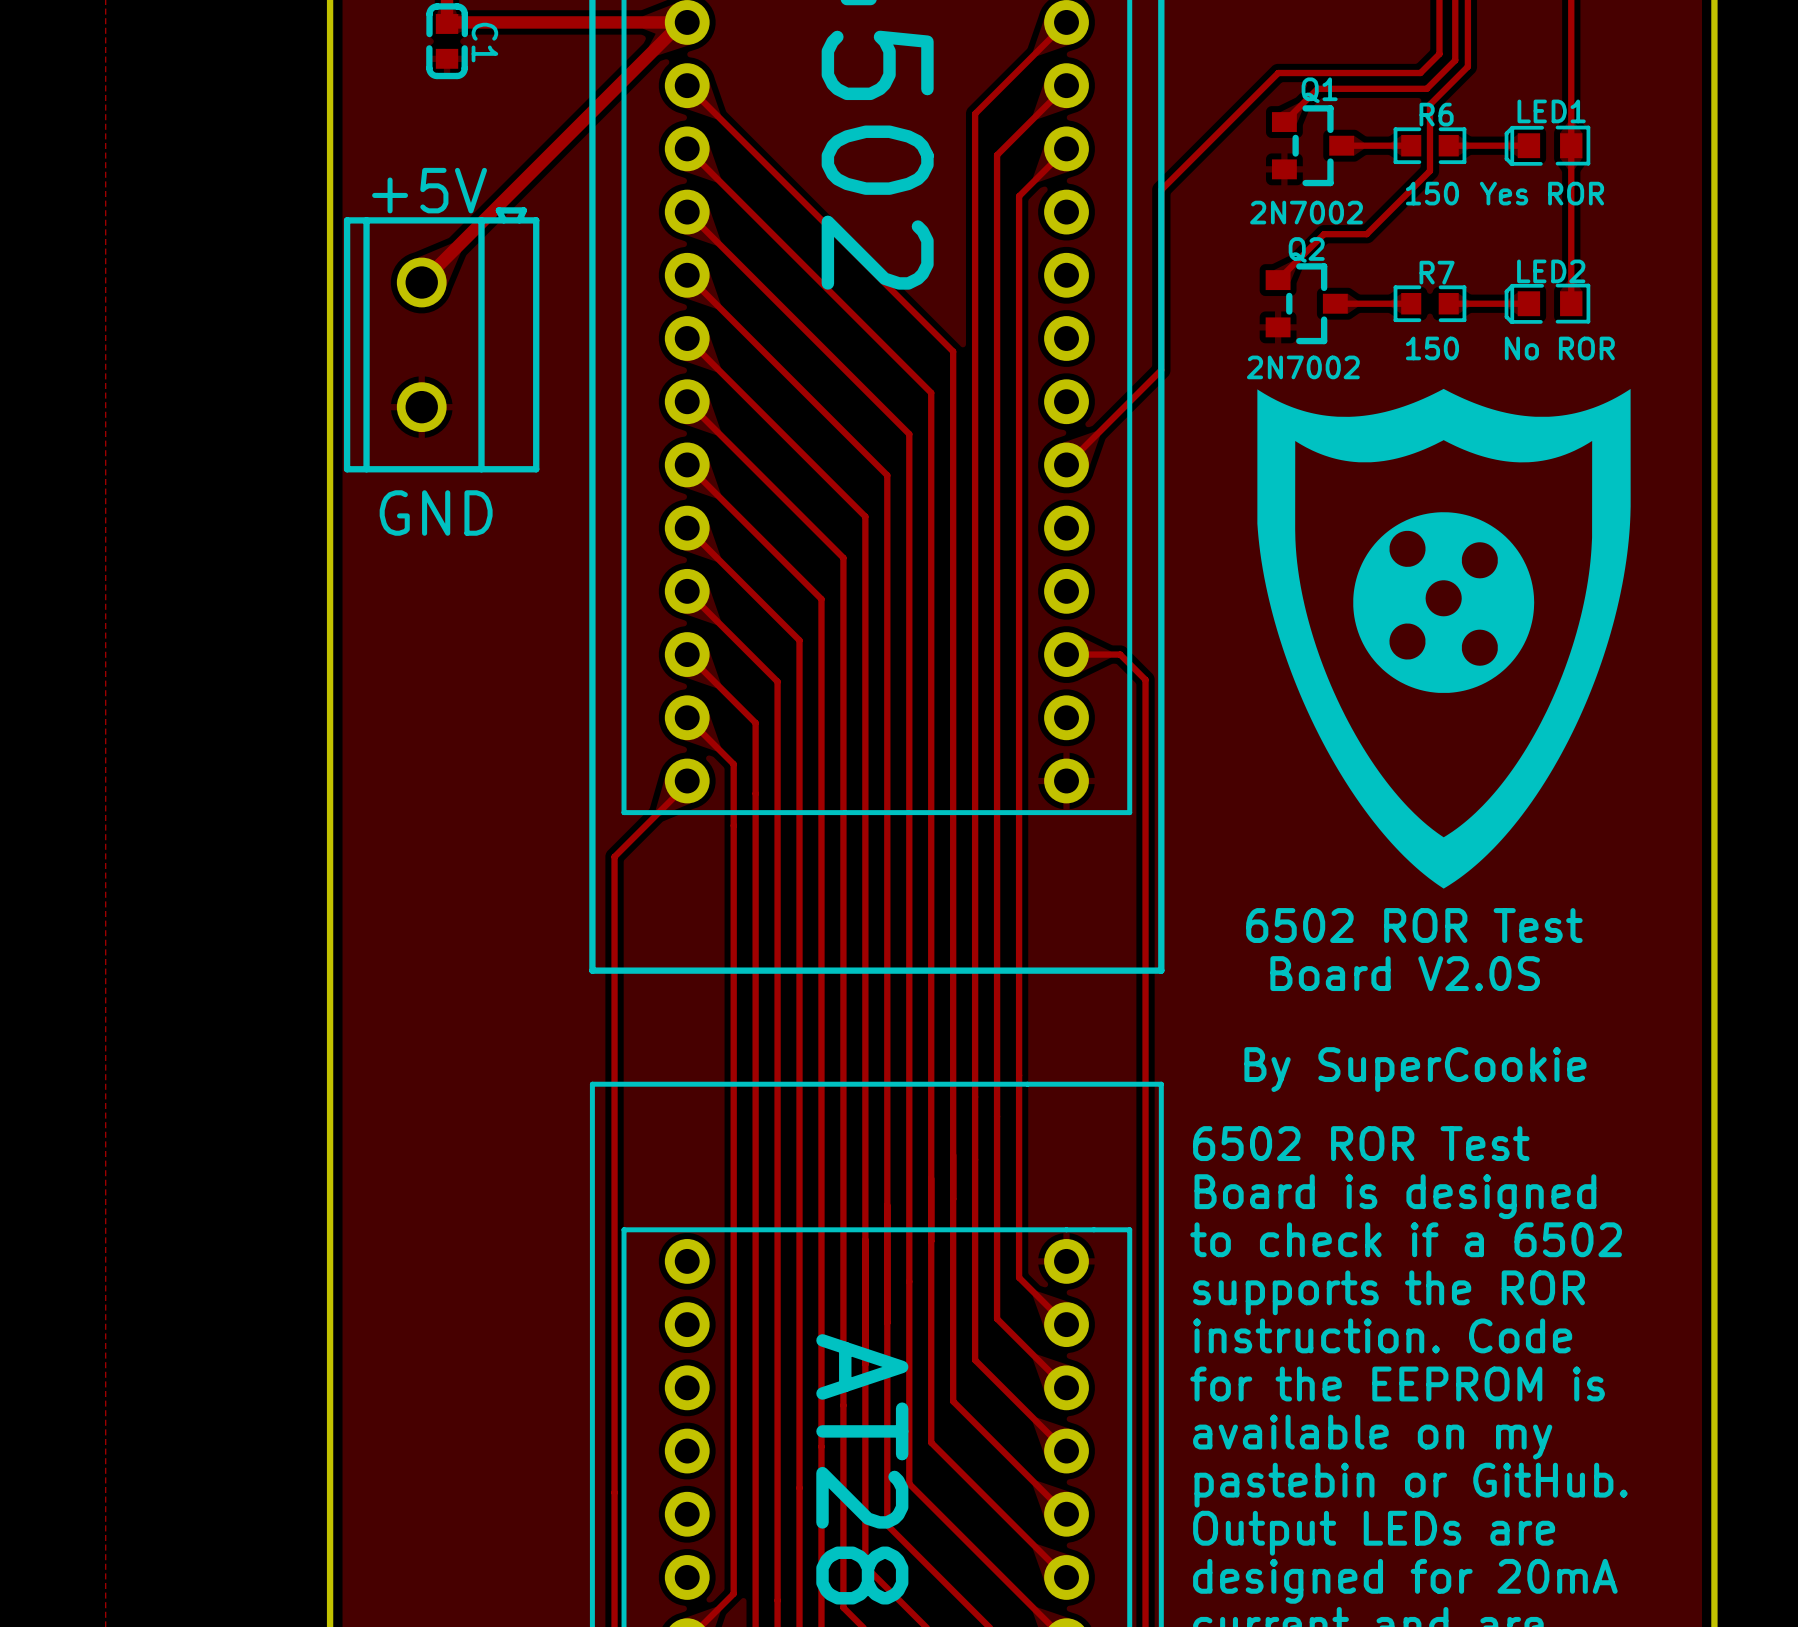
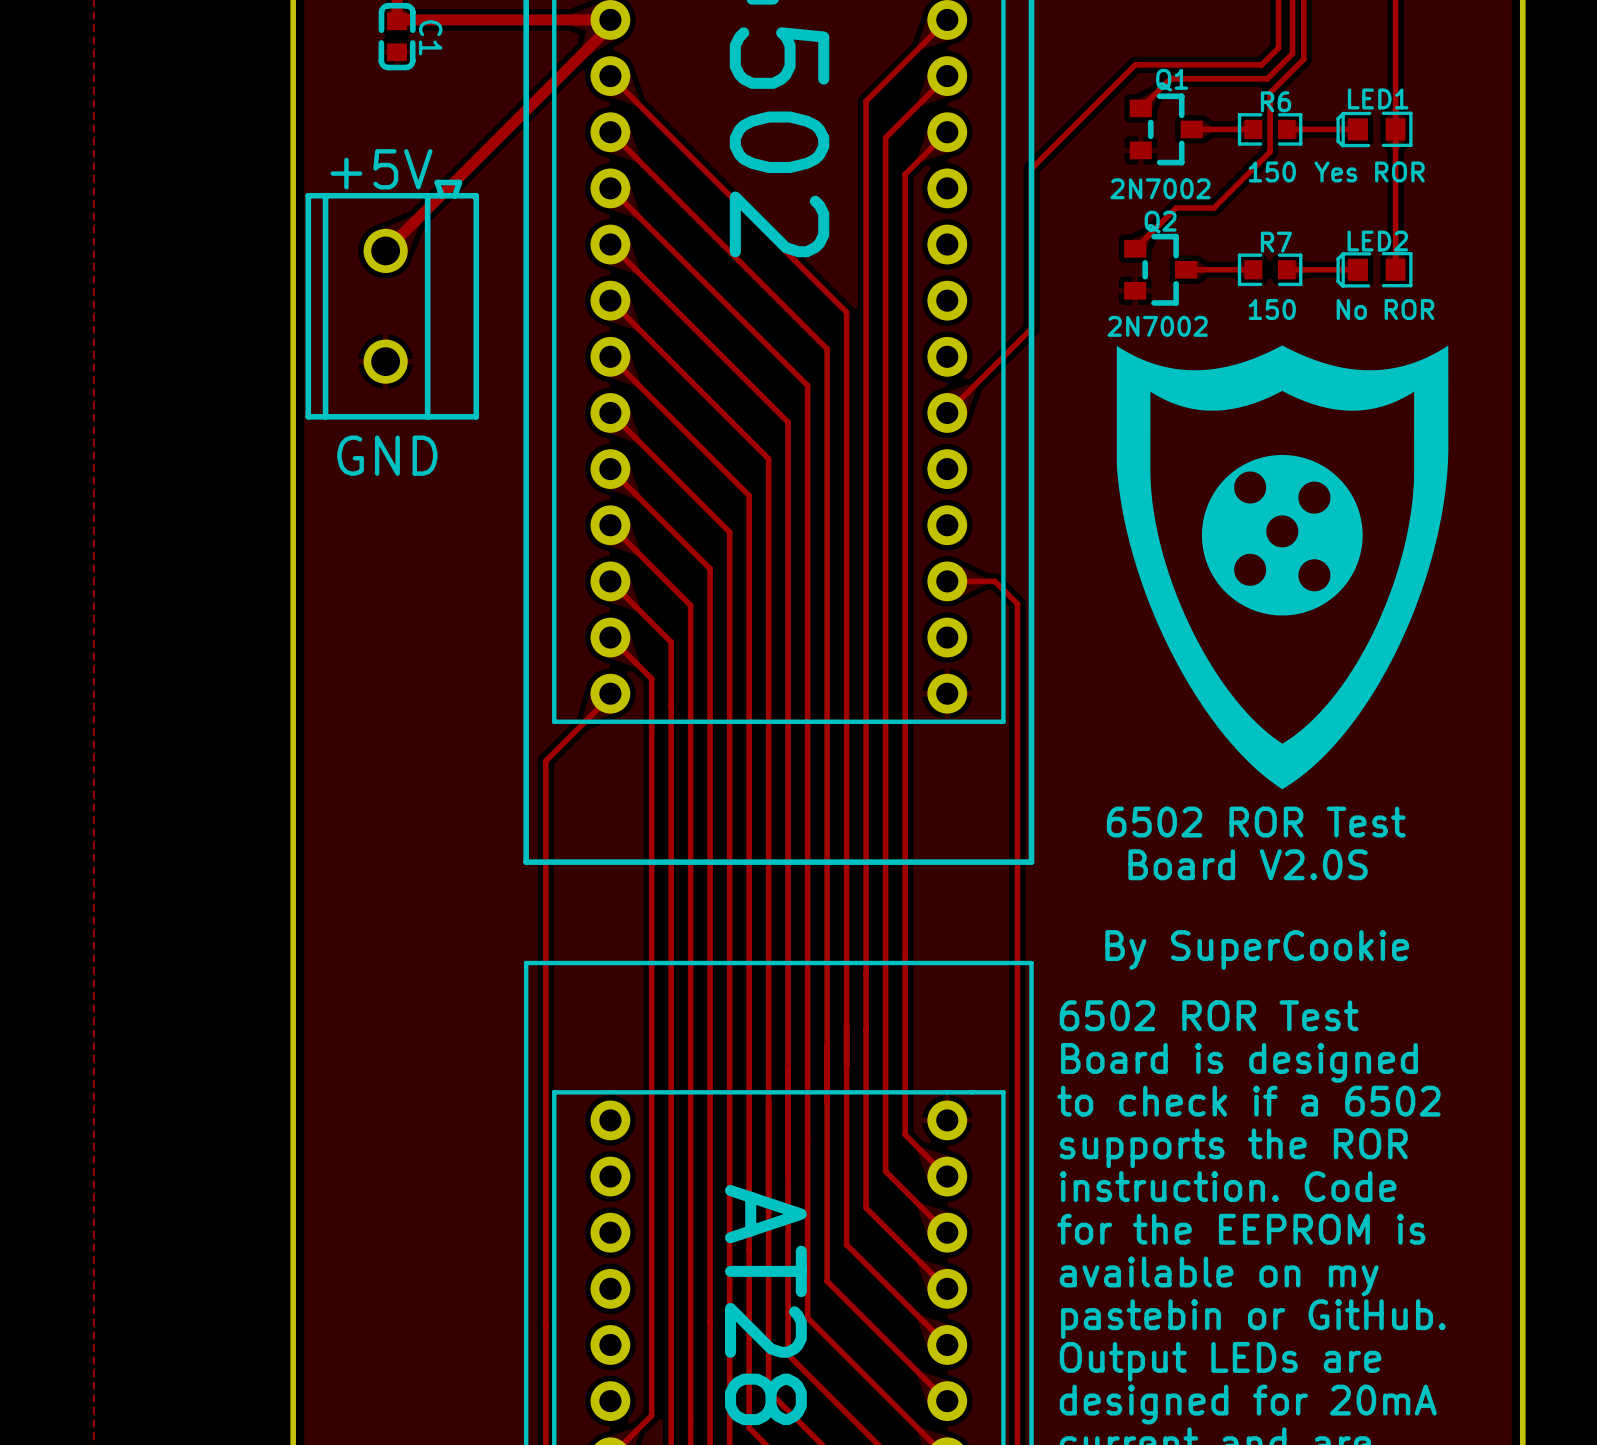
track: (681, 22) (421, 282) -> none
track: none -> (610, 19) (610, 26) (385, 250)
part footprint: [343, 207, 540, 473] -> [305, 179, 480, 420]

